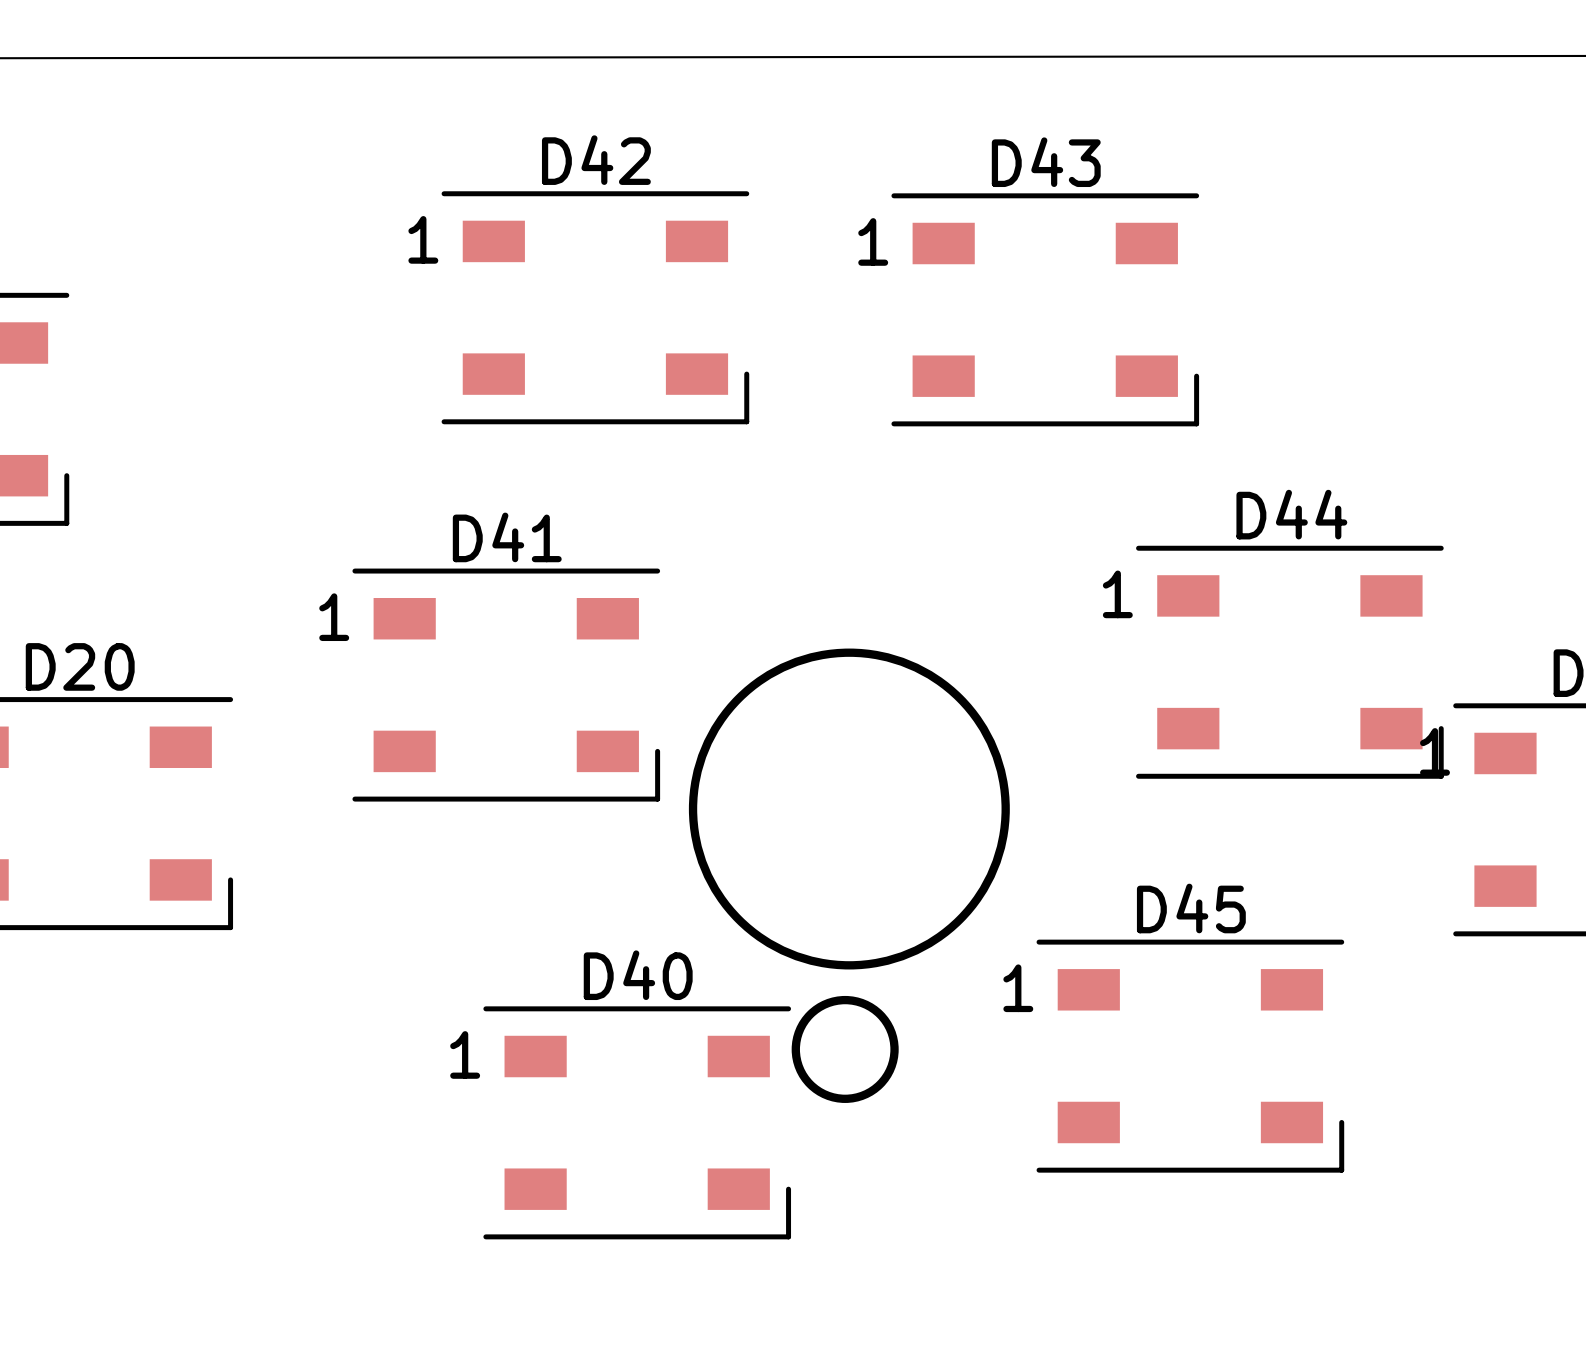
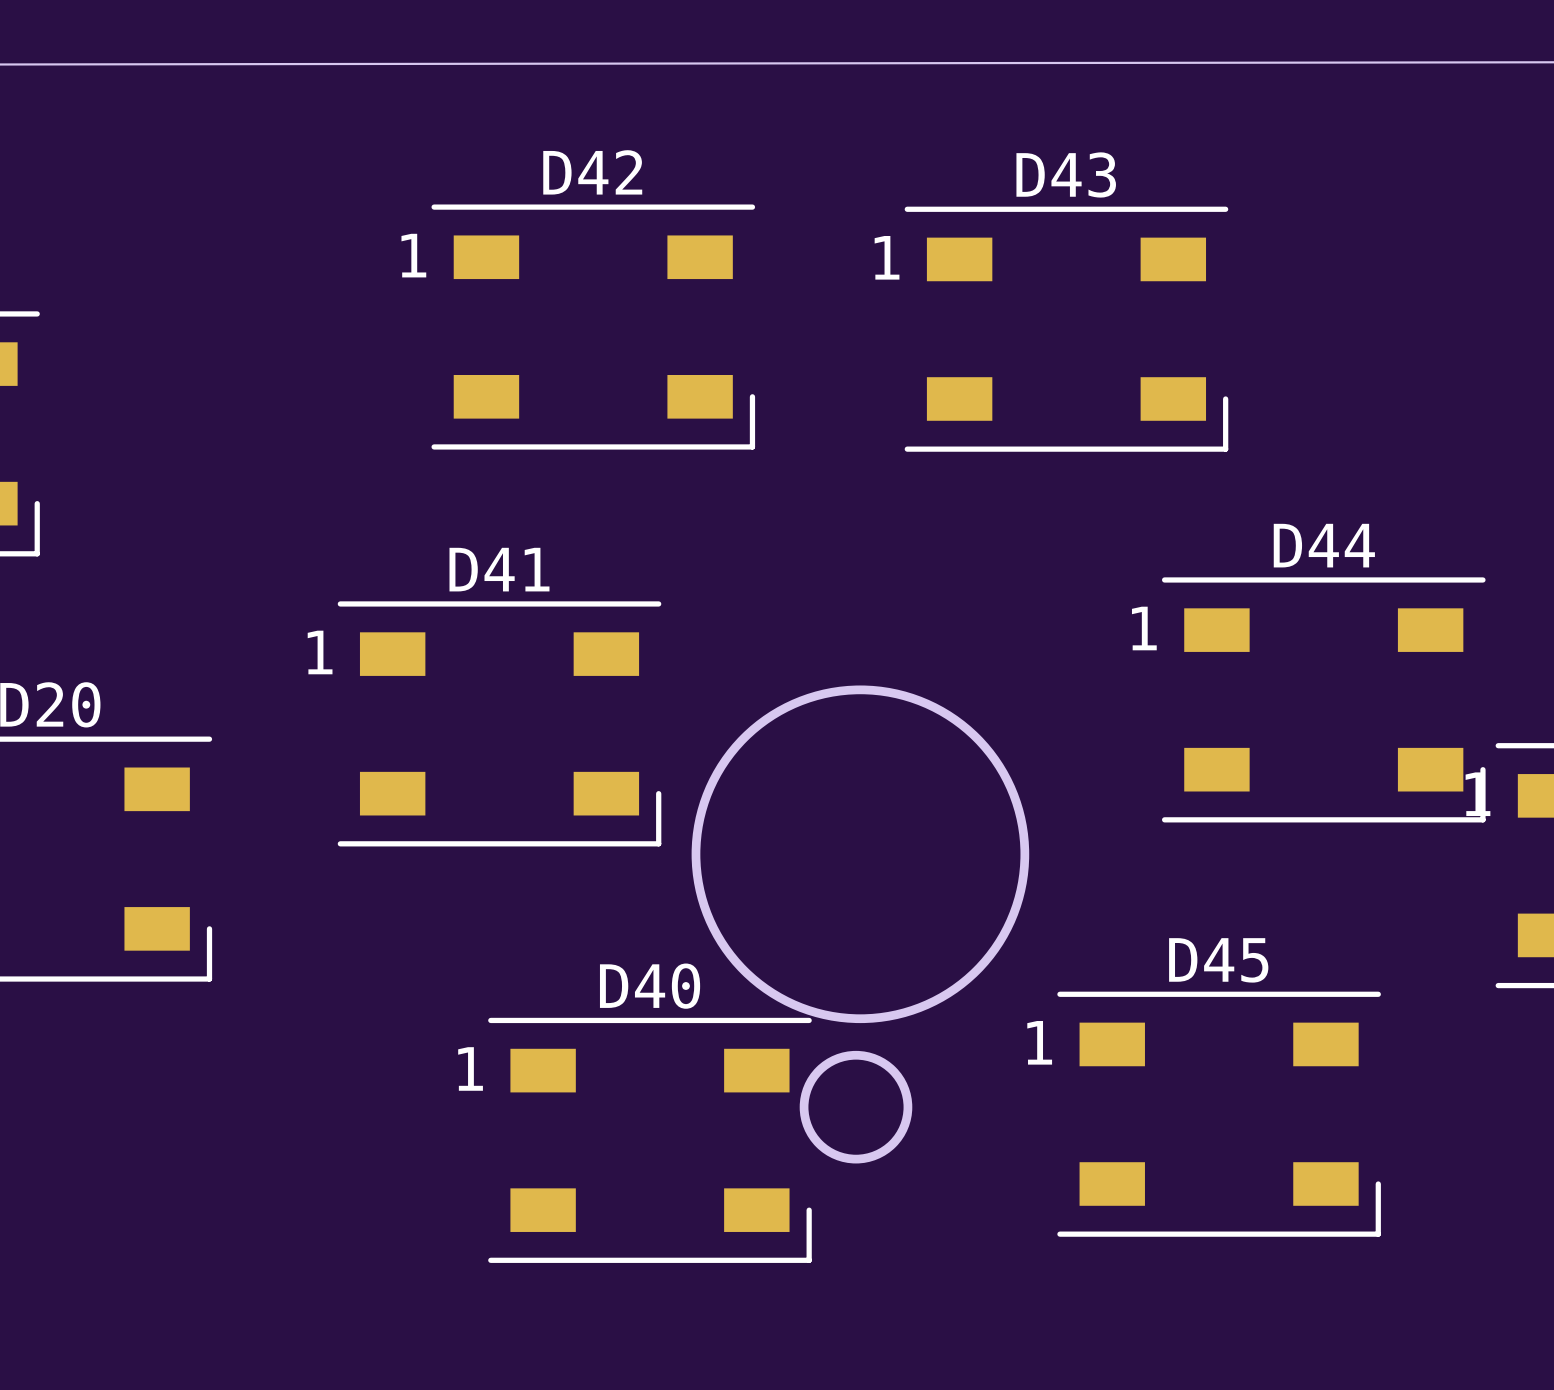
D40 position: (637, 1122) -> (649, 1140)

